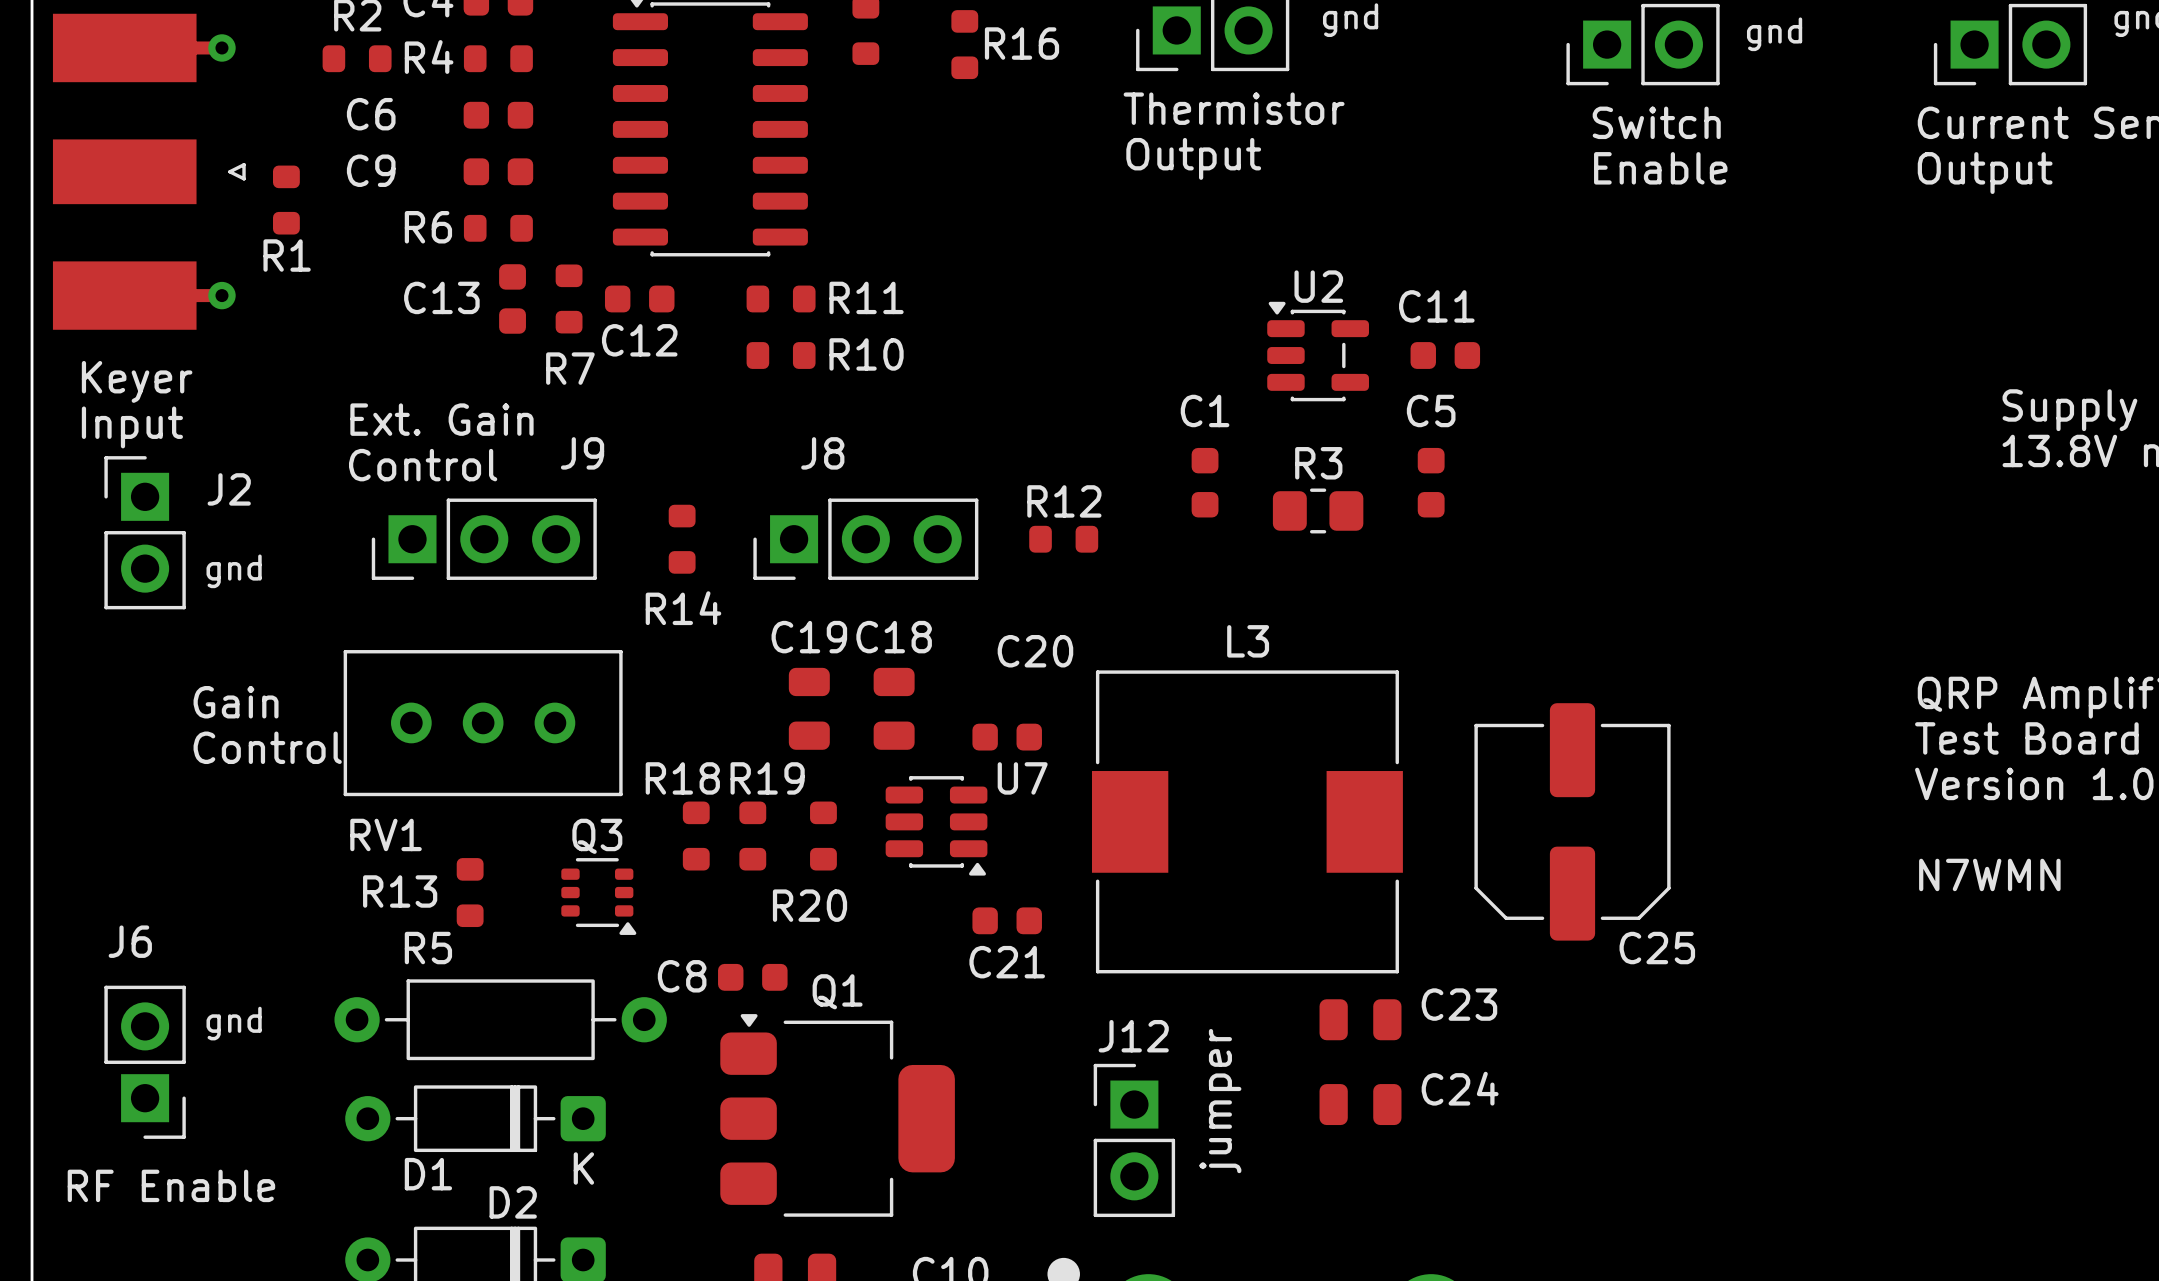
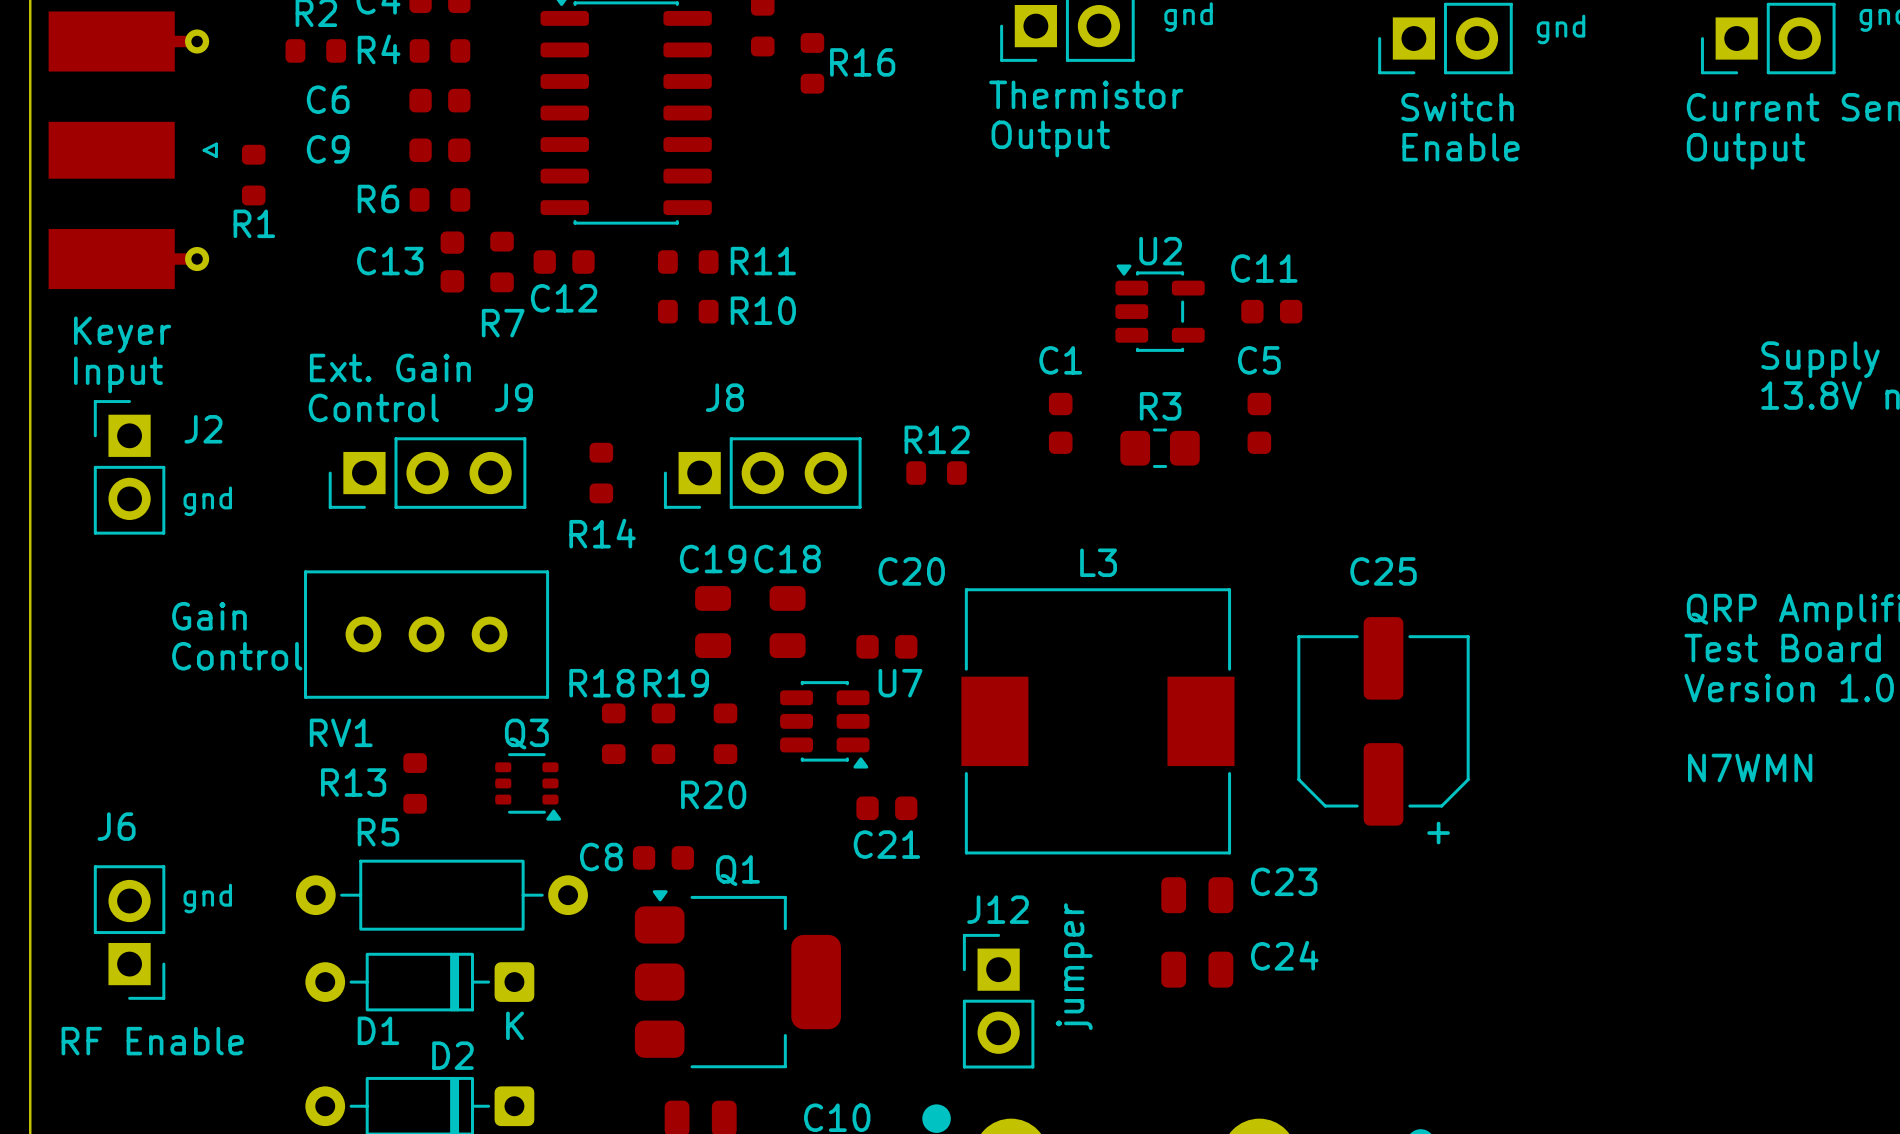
R16 position: (964, 44) -> (812, 63)
text: none -> + (1438, 833)
C25 name position: C25 (1657, 948) -> C25 (1383, 571)

